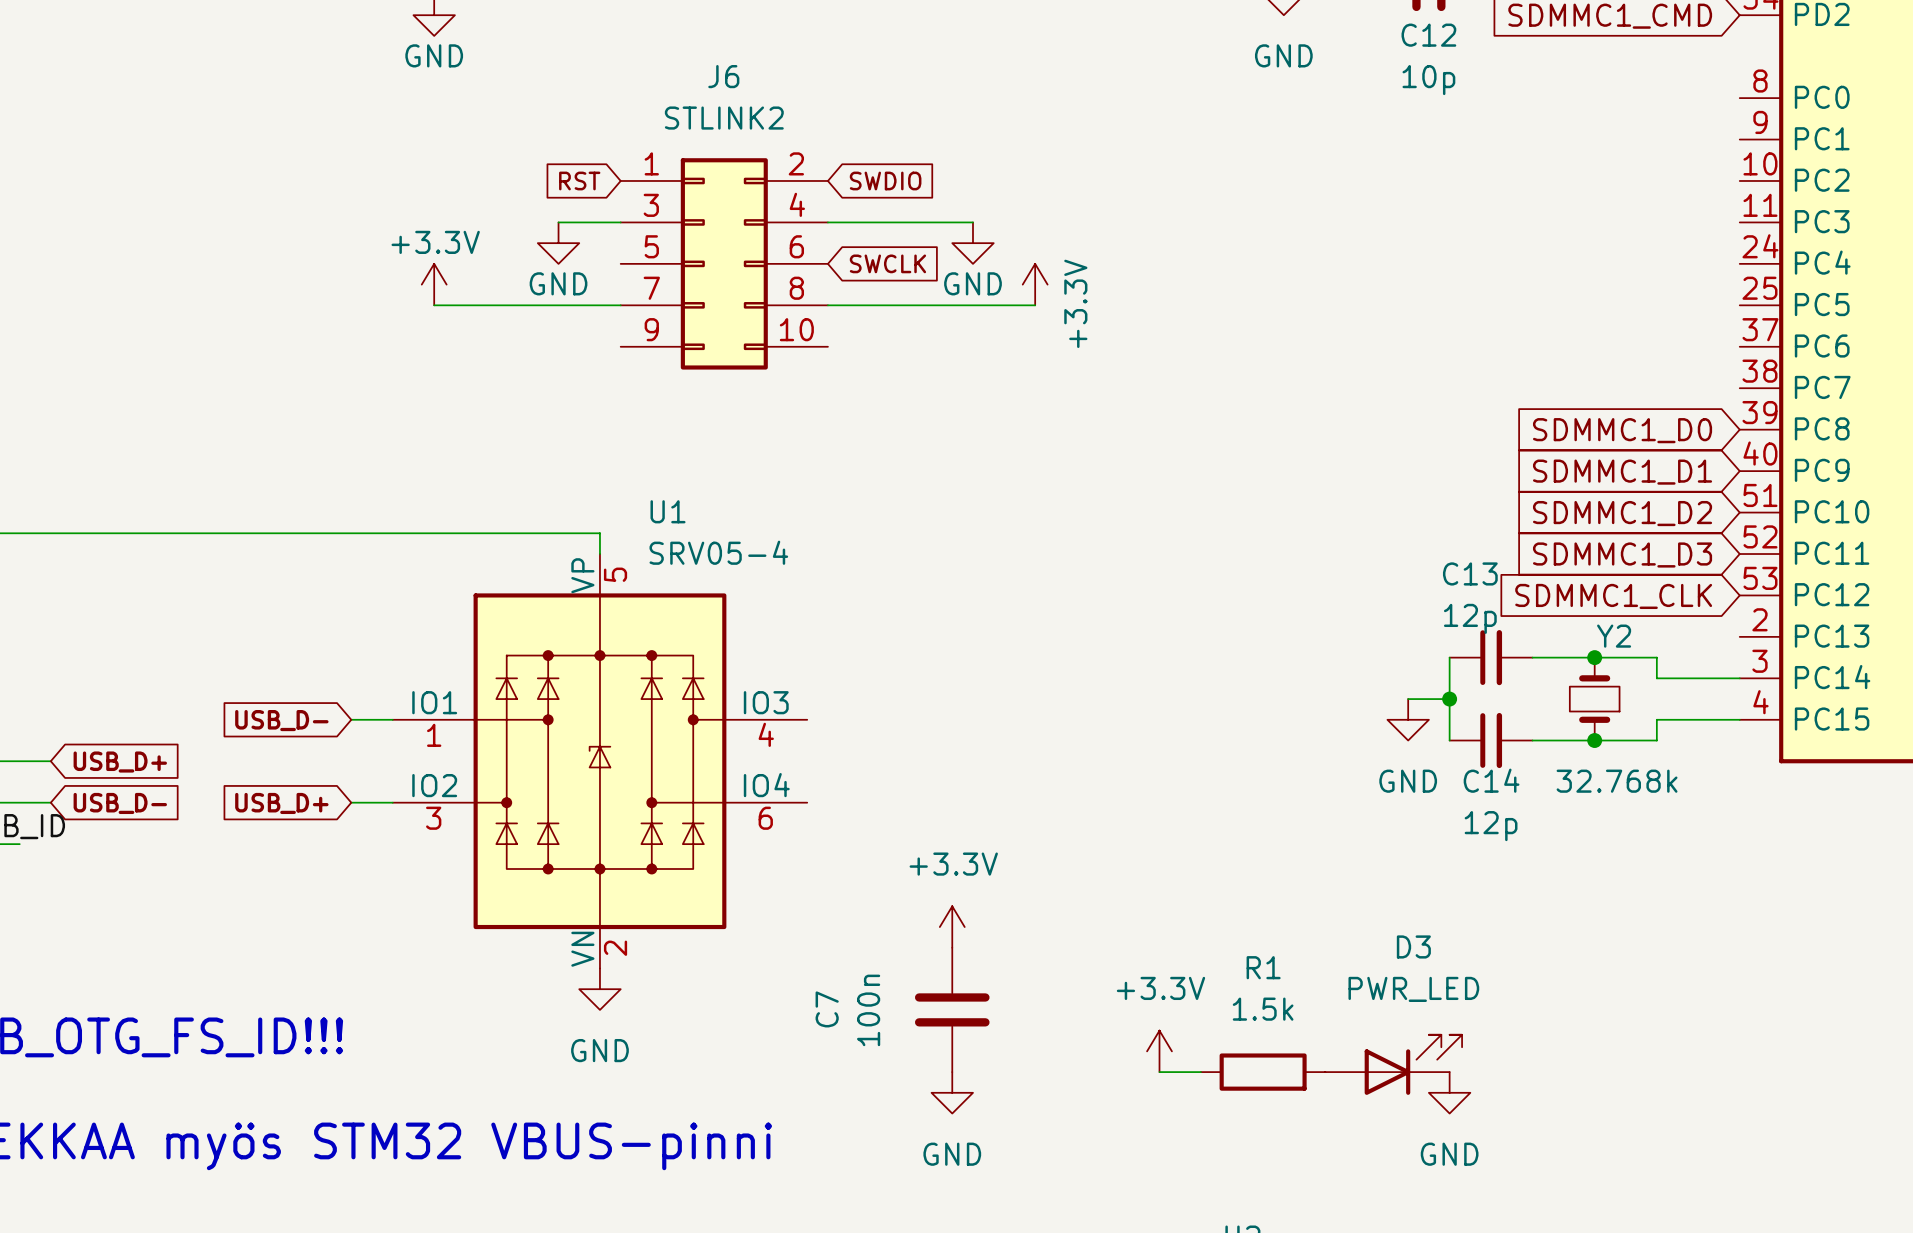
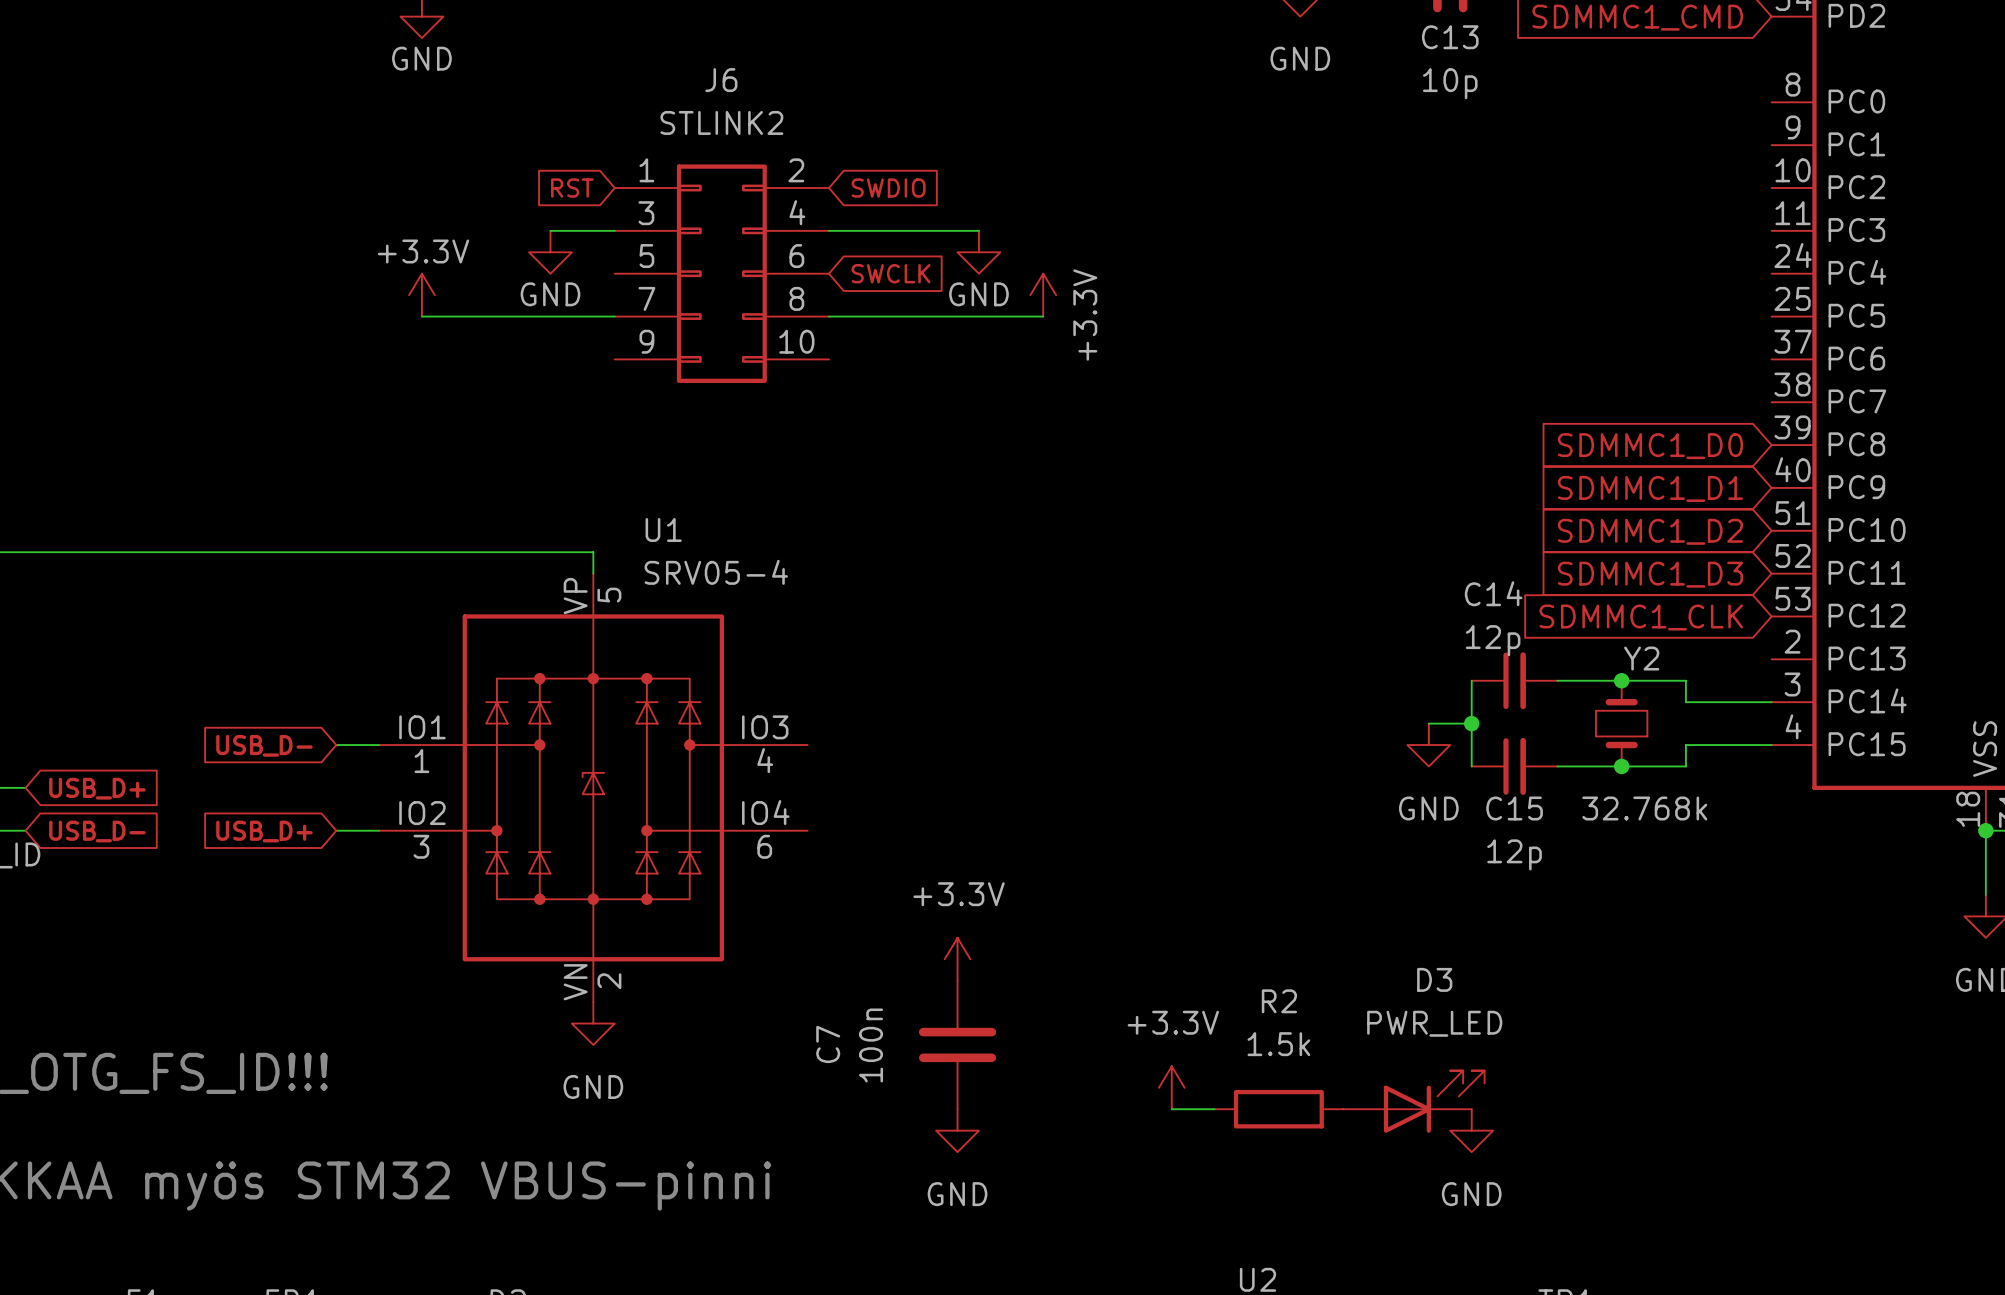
C12 name: C12 (1428, 35) -> C13 (1450, 37)
C13 name: C13 (1470, 573) -> C14 (1493, 593)
C14 name: C14 (1491, 780) -> C15 (1514, 808)
R1 name: R1 (1263, 967) -> R2 (1279, 1001)

